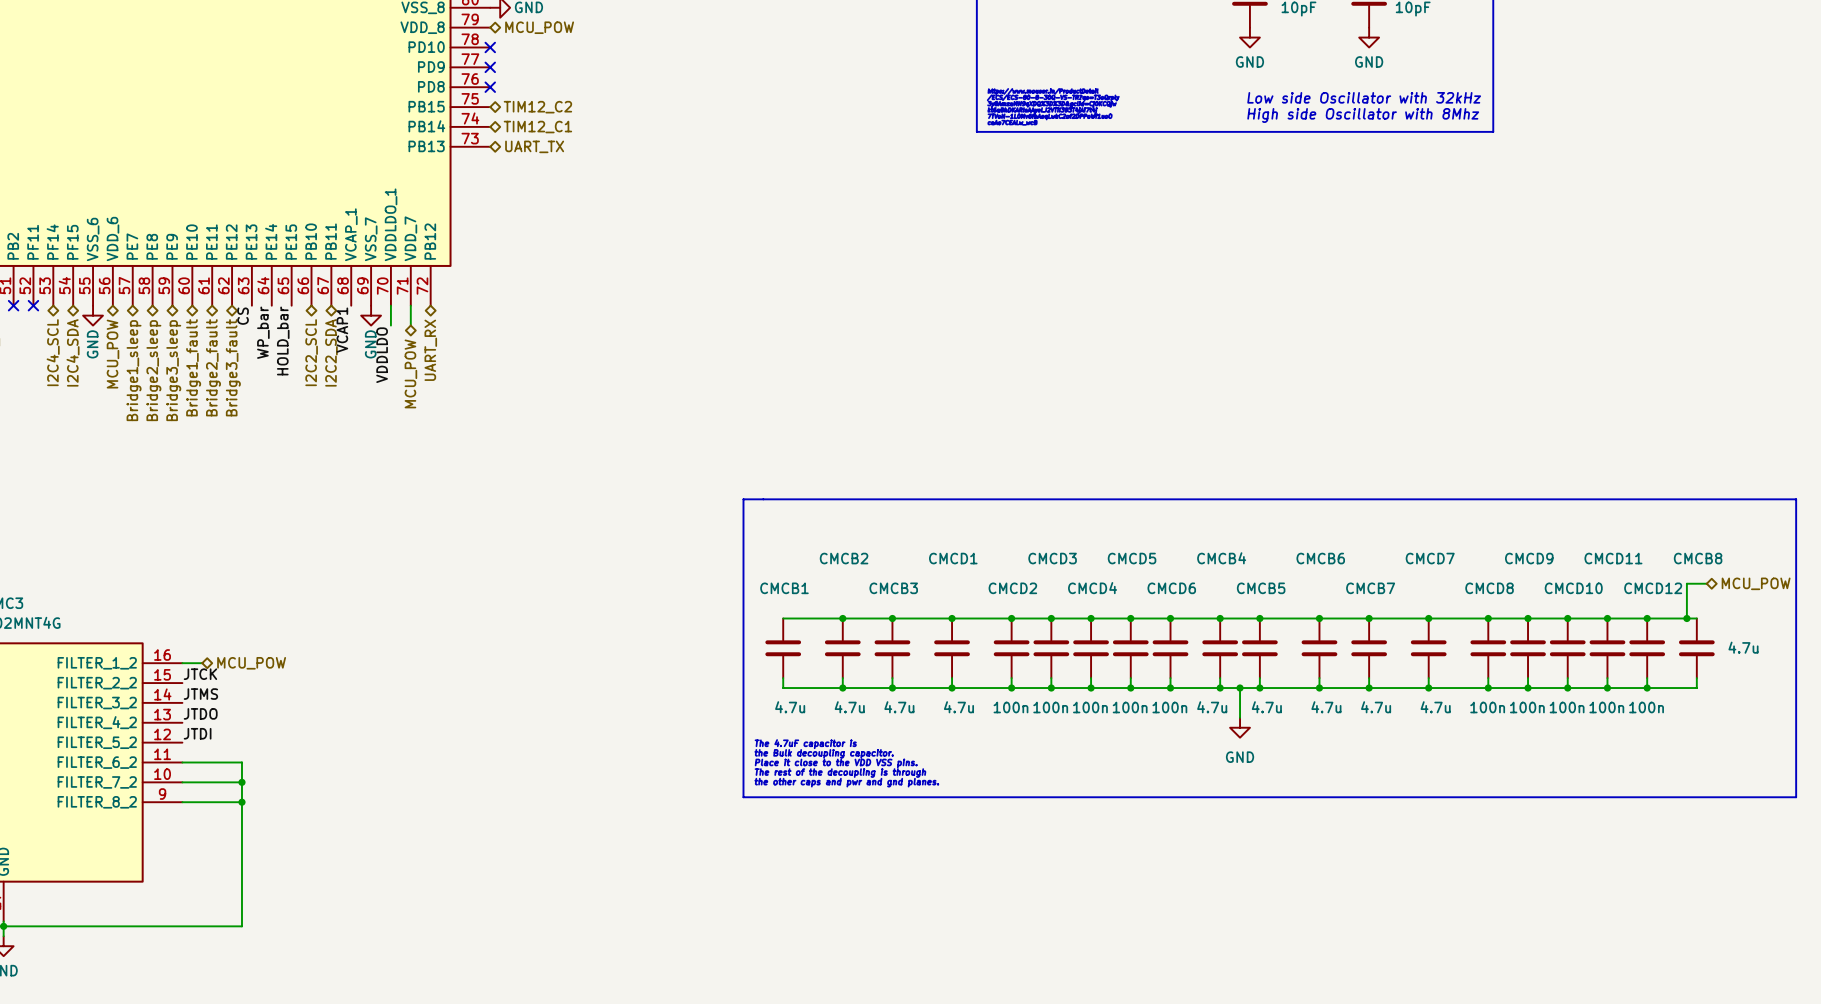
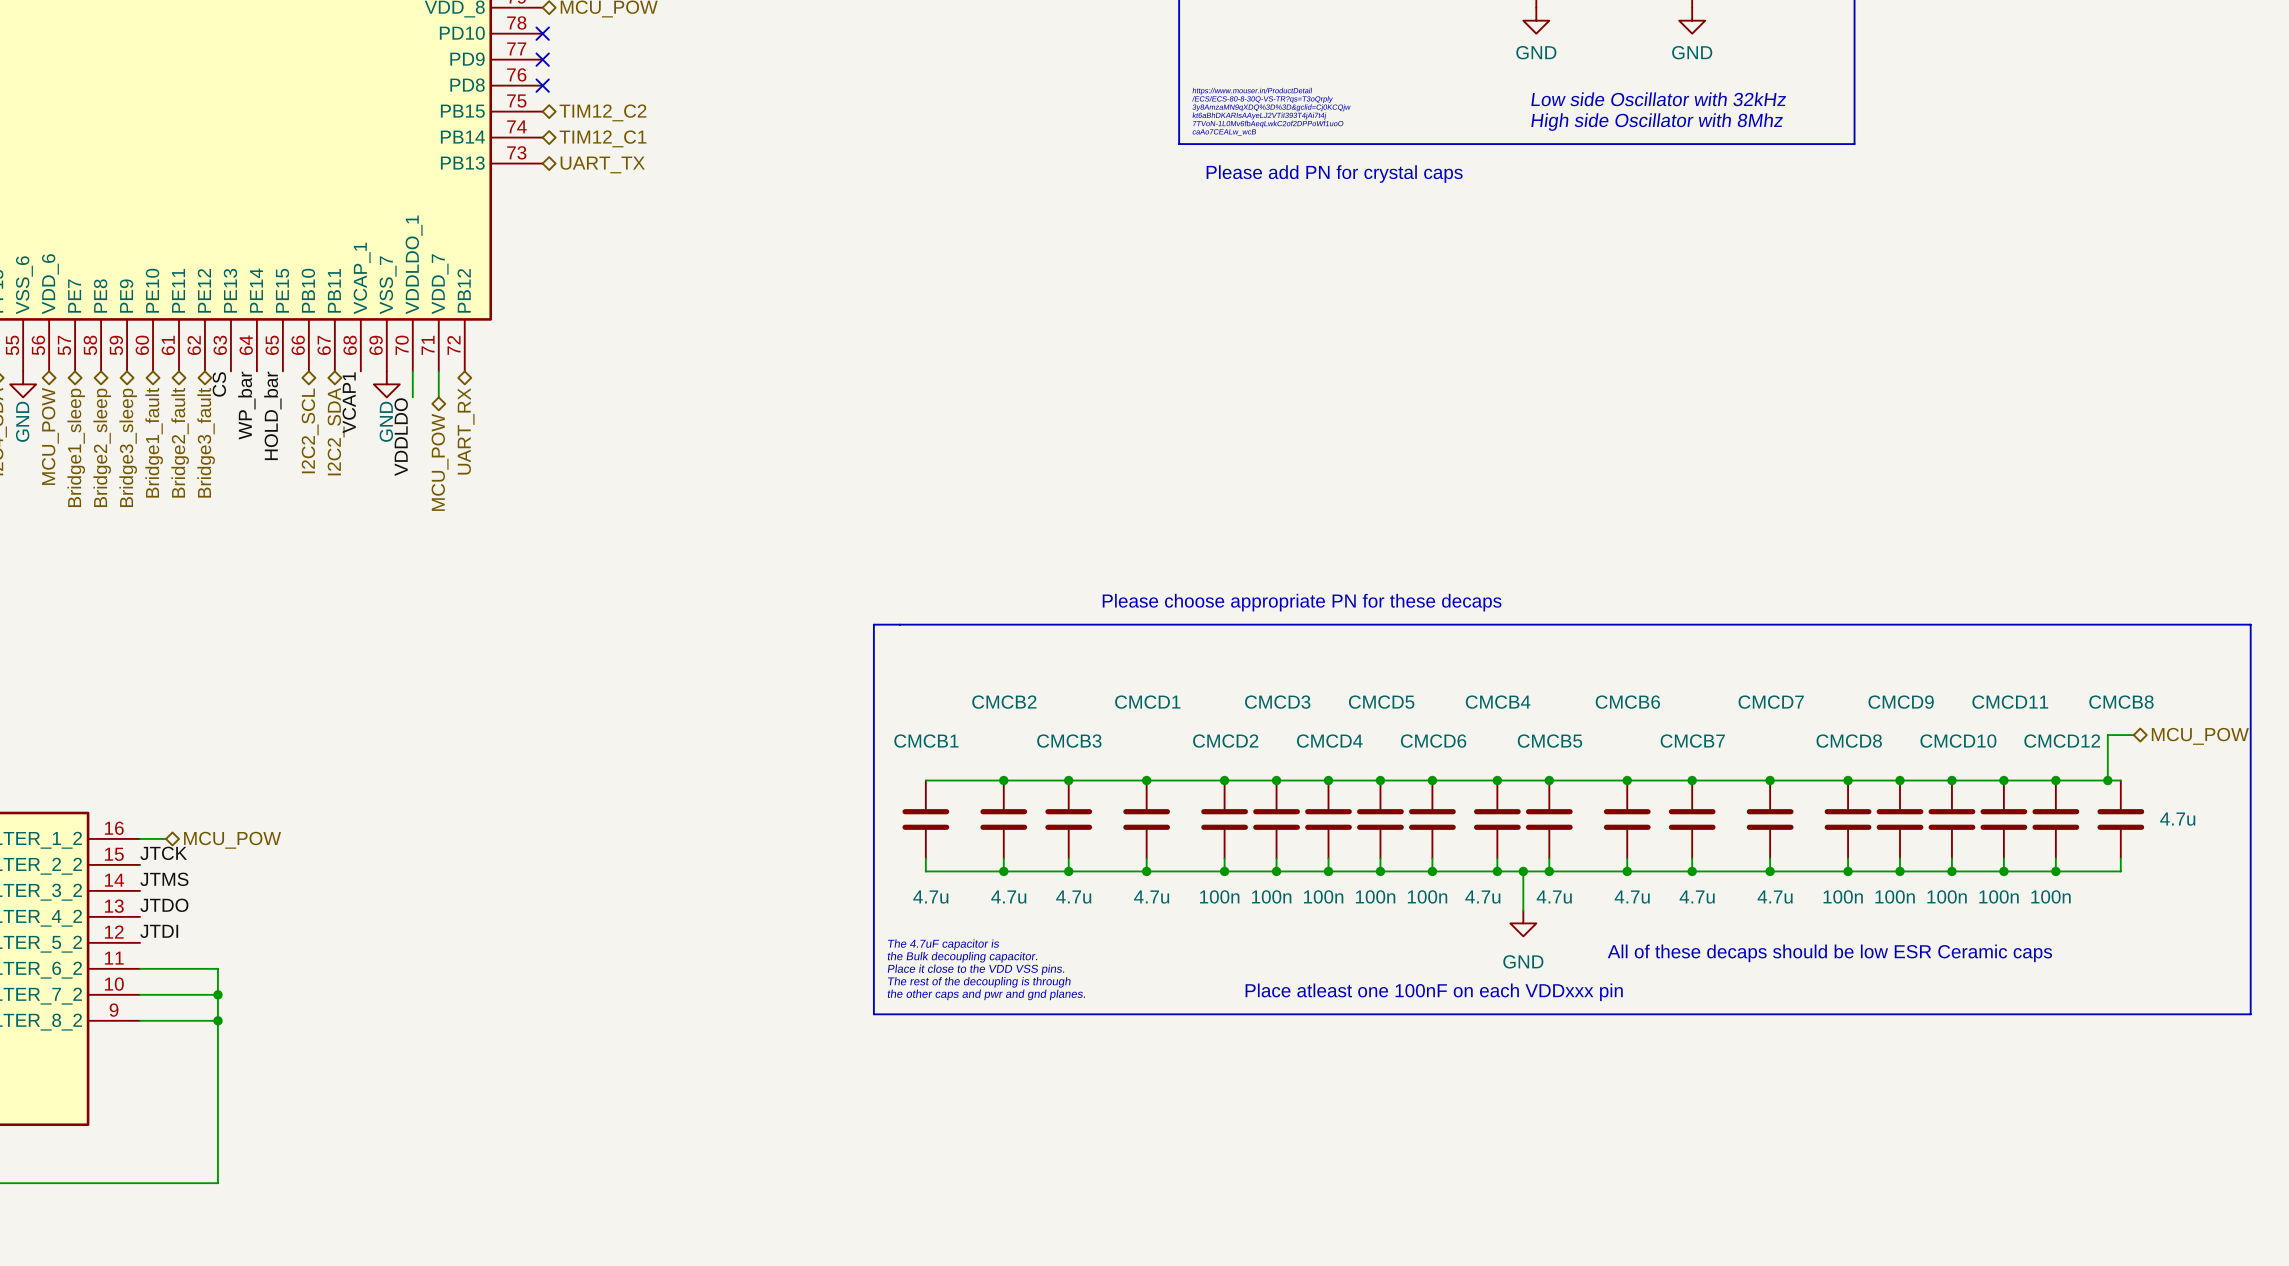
text: none -> Please add PN for crystal caps (1334, 174)
text: none -> Please choose appropriate PN for these decaps (1302, 602)
text: none -> All of these decaps should be low ESR Ceramic caps (1829, 953)
text: none -> Place atleast one 100nF on each VDDxxx pin (1434, 992)

